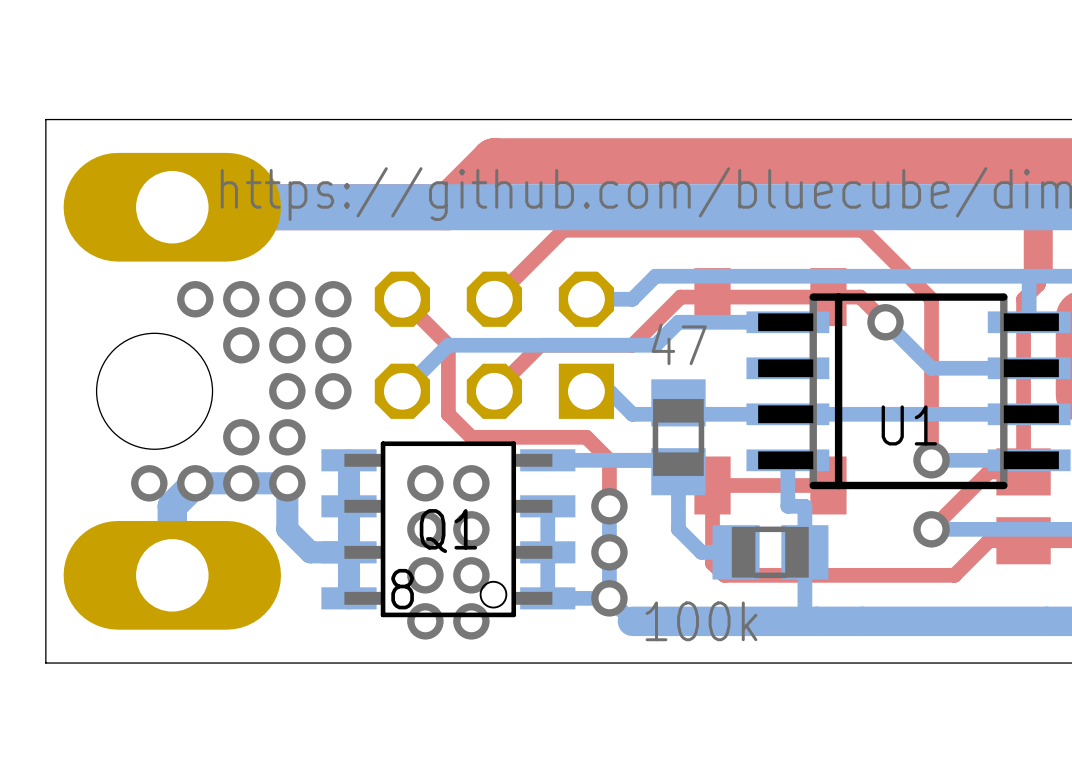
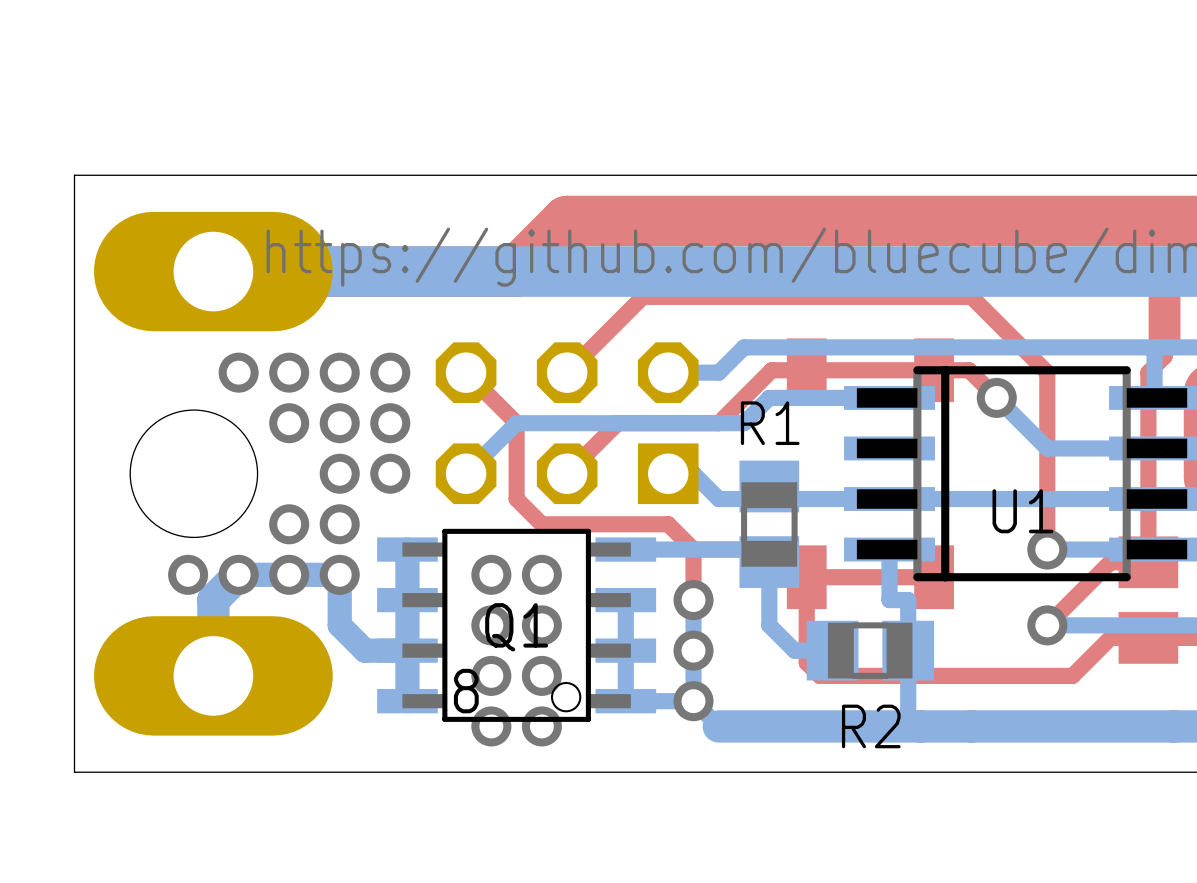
R1 value: 47 (679, 344) -> none
R1 name: none -> R1 (770, 423)
R2 value: 100k (701, 621) -> none
R2 name: none -> R2 (871, 726)

